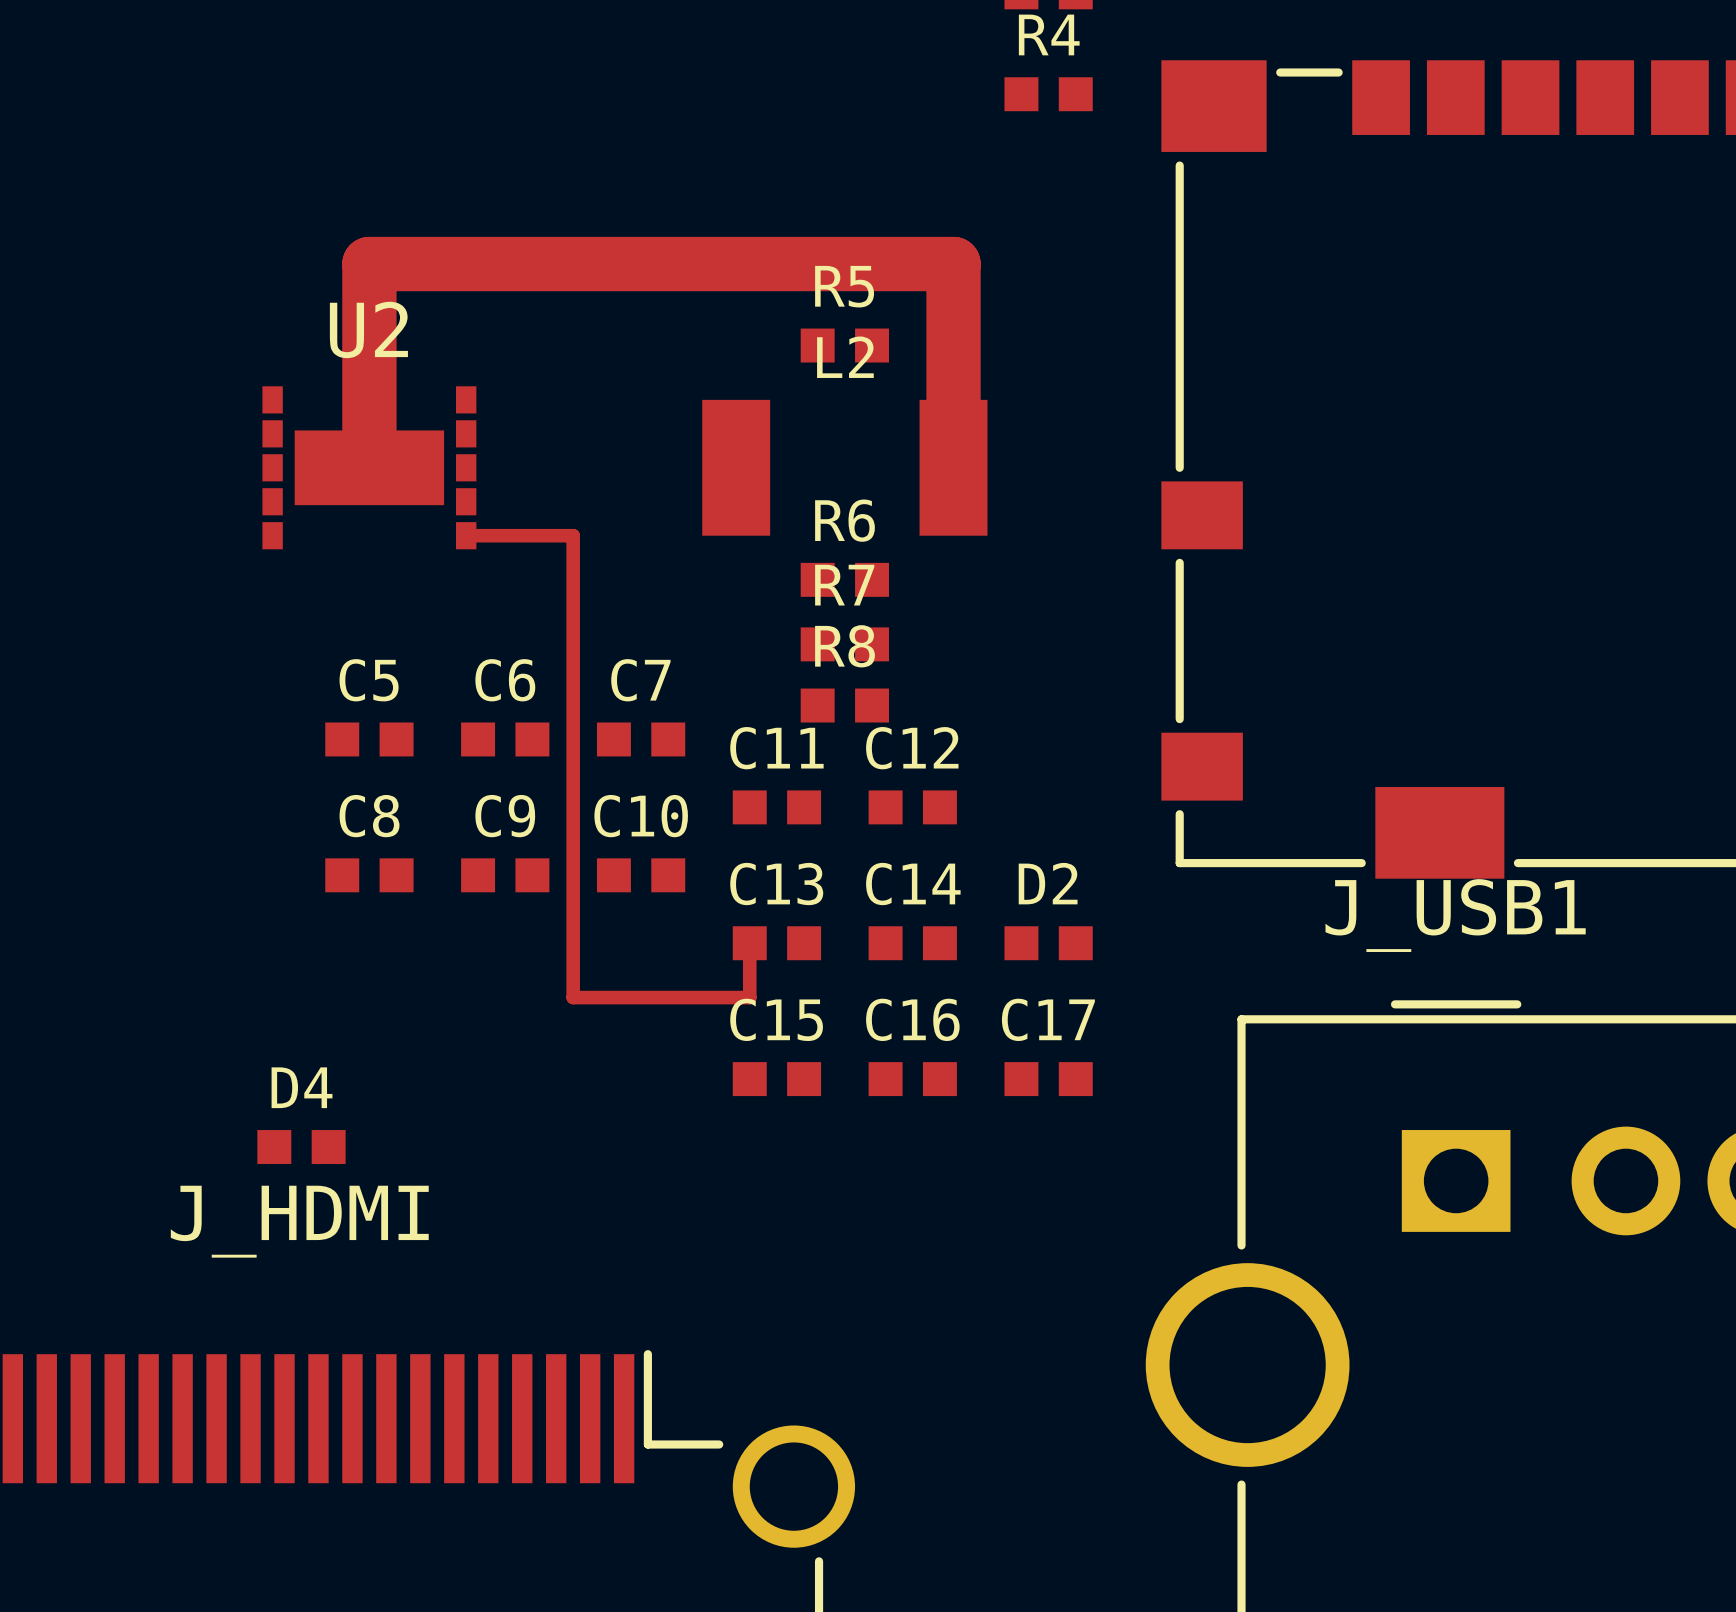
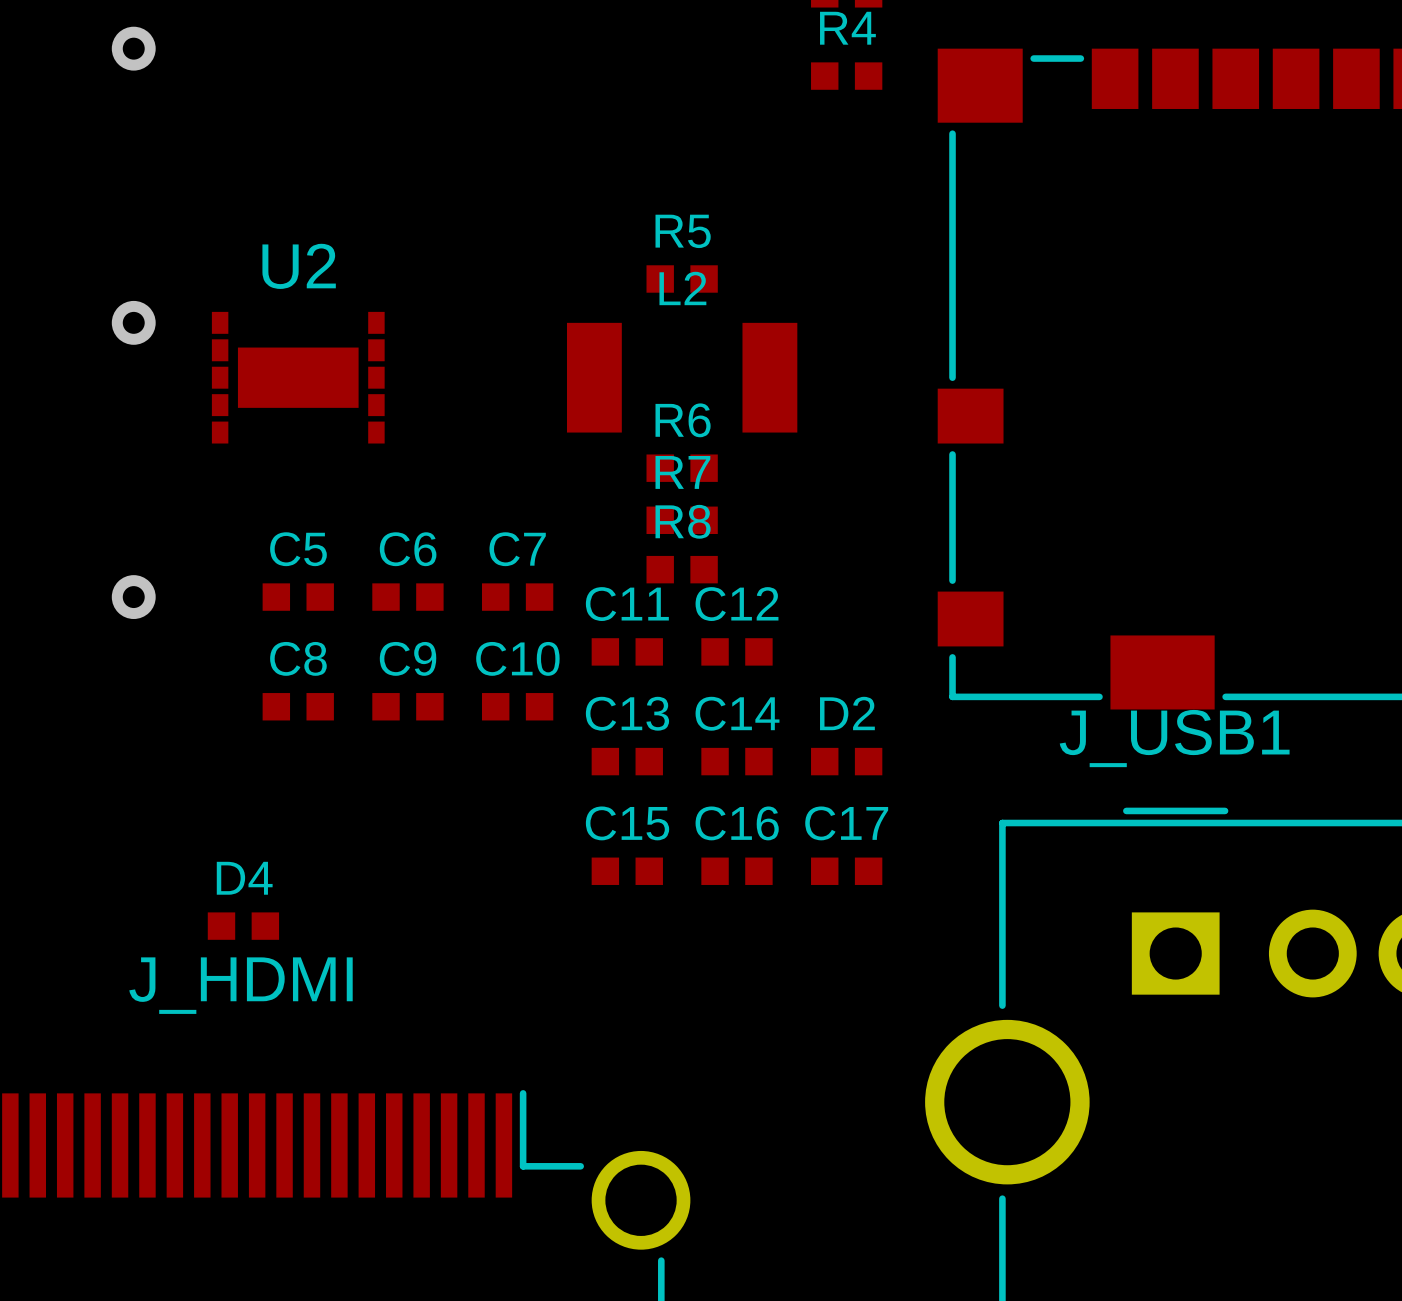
via: none -> (133, 48)
via: none -> (133, 322)
track: (369, 467) (369, 264) (953, 264) (953, 467) -> none
track: (466, 535) (573, 535) (573, 997) (749, 997) (749, 943) -> none
via: none -> (133, 597)

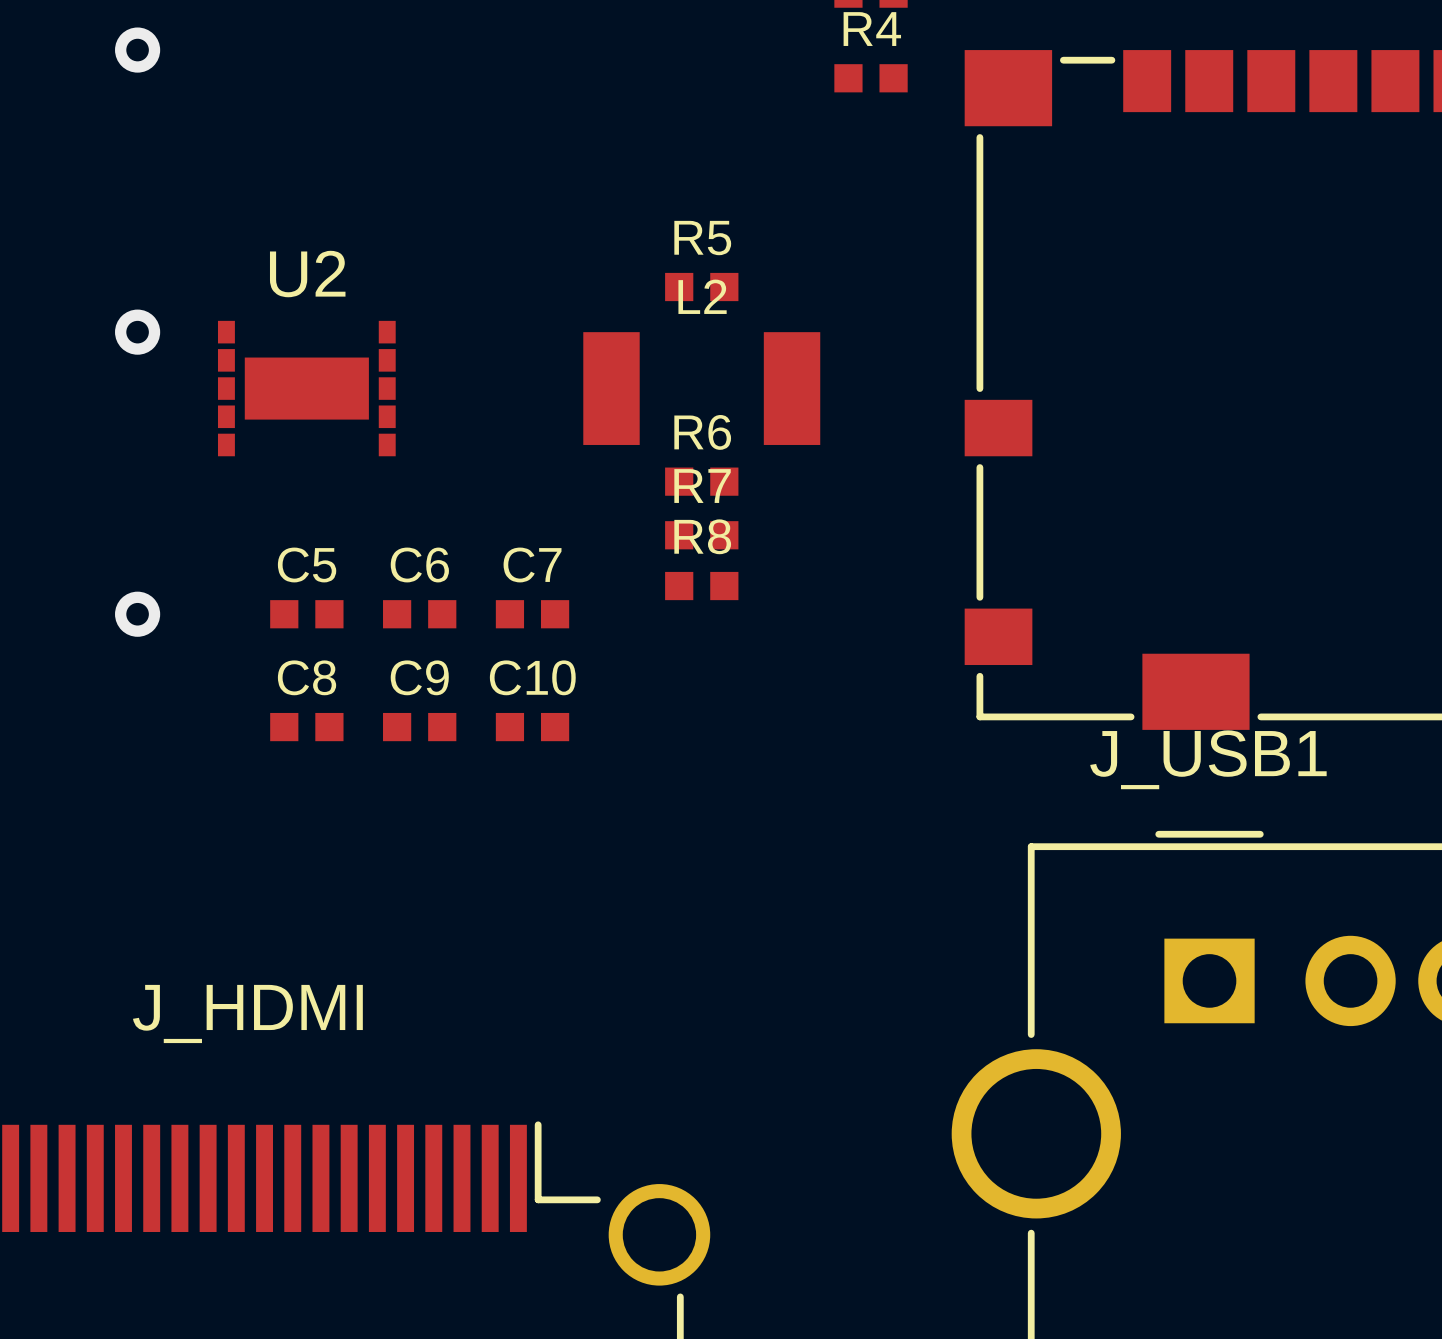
C11: (627, 651) -> none
C12: (736, 651) -> none
C13: (627, 761) -> none
C14: (736, 761) -> none
D2: (846, 761) -> none
C15: (627, 871) -> none
C16: (736, 871) -> none
C17: (846, 871) -> none
D4: (243, 926) -> none

